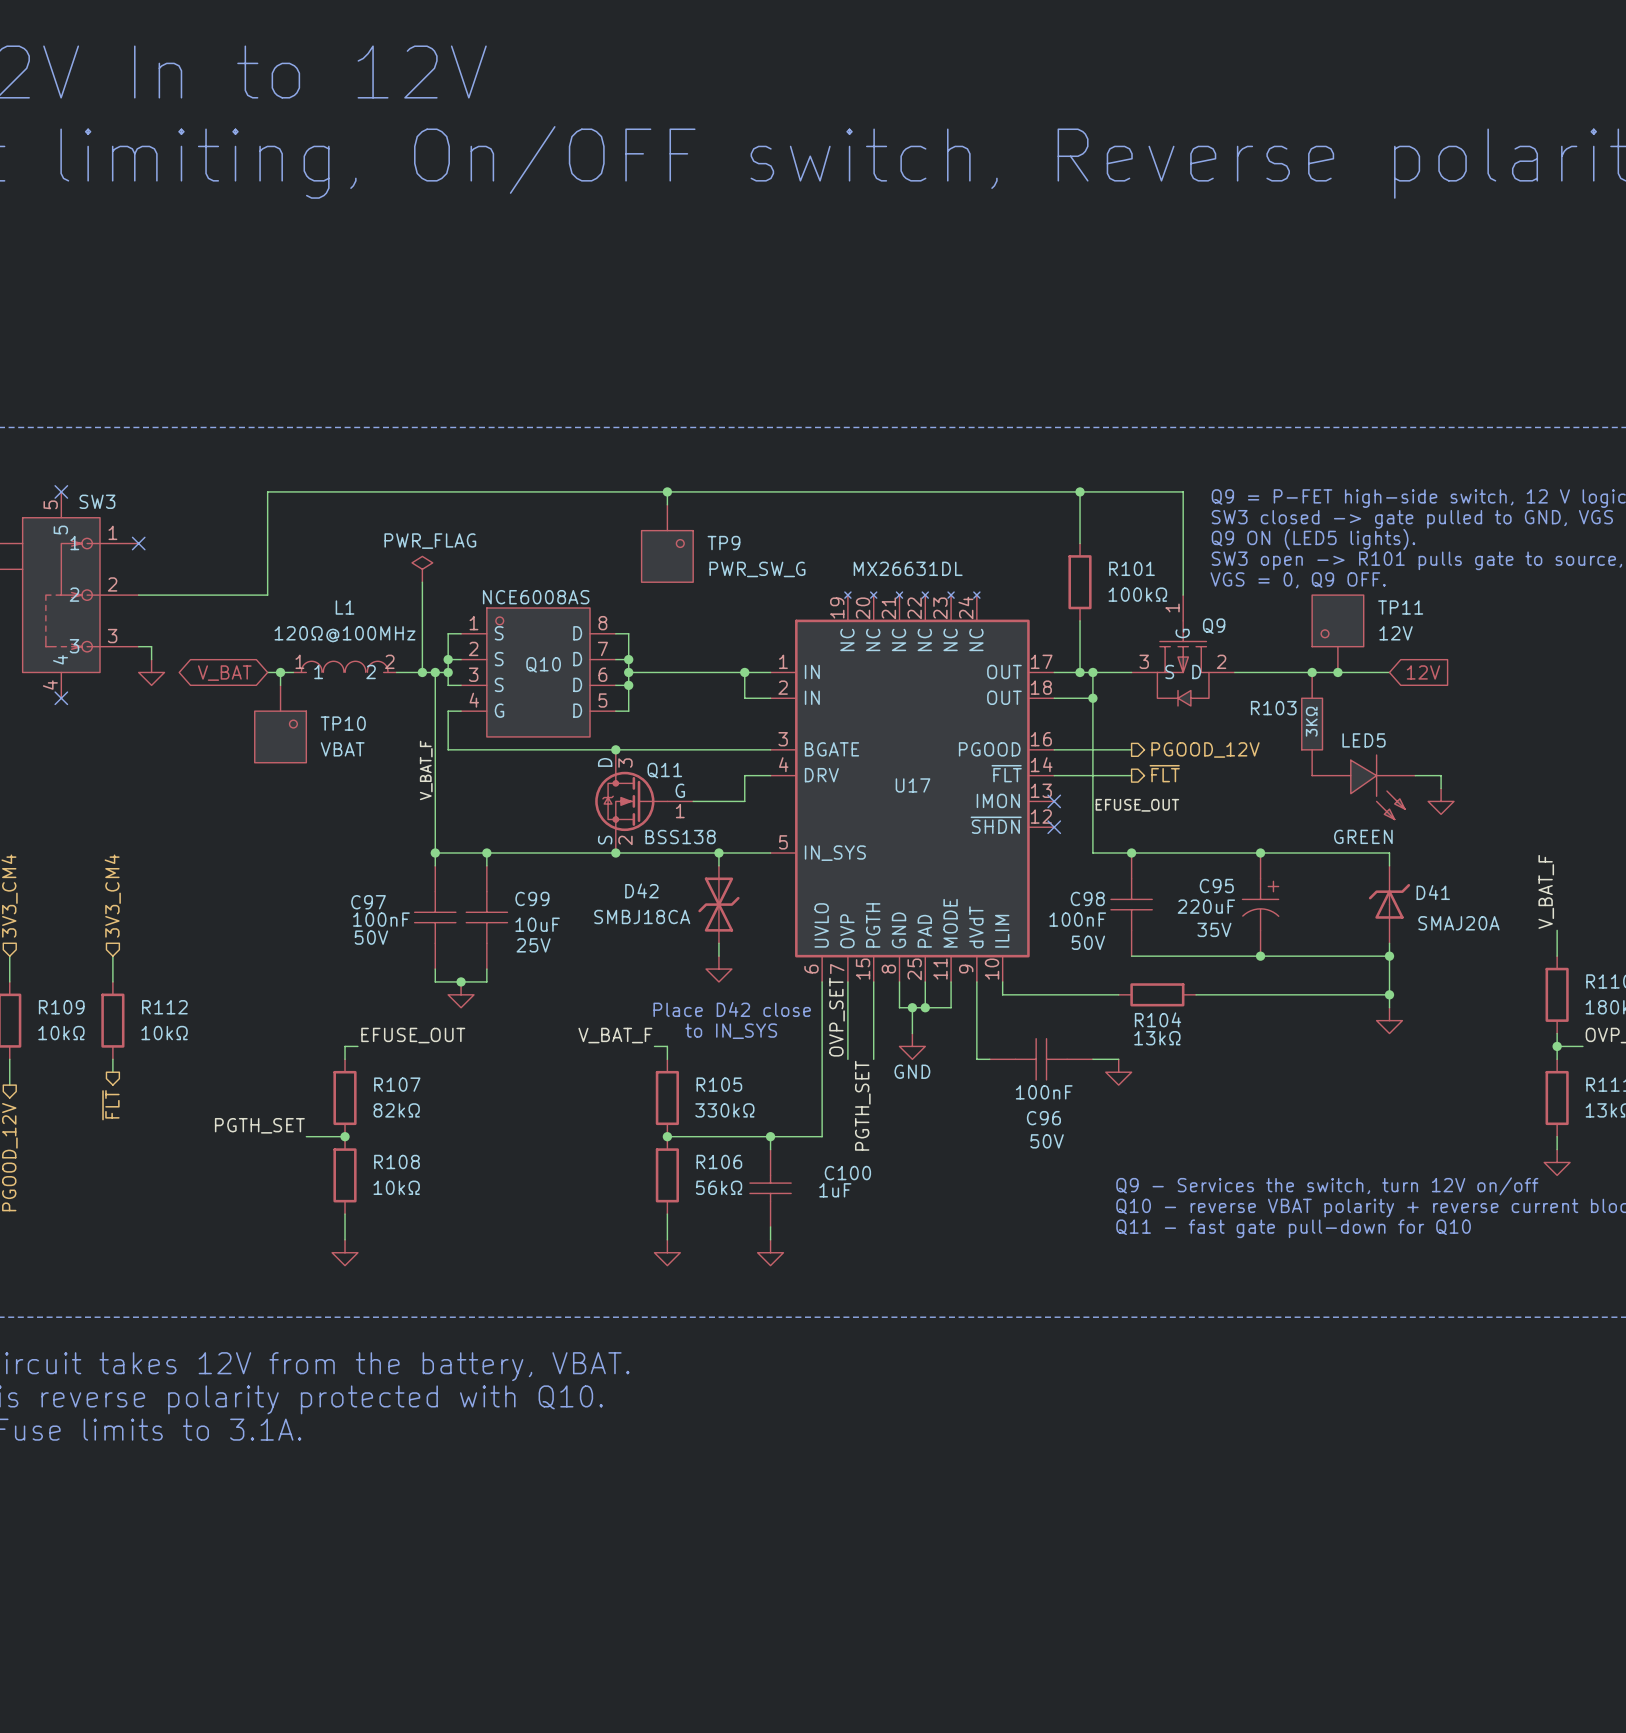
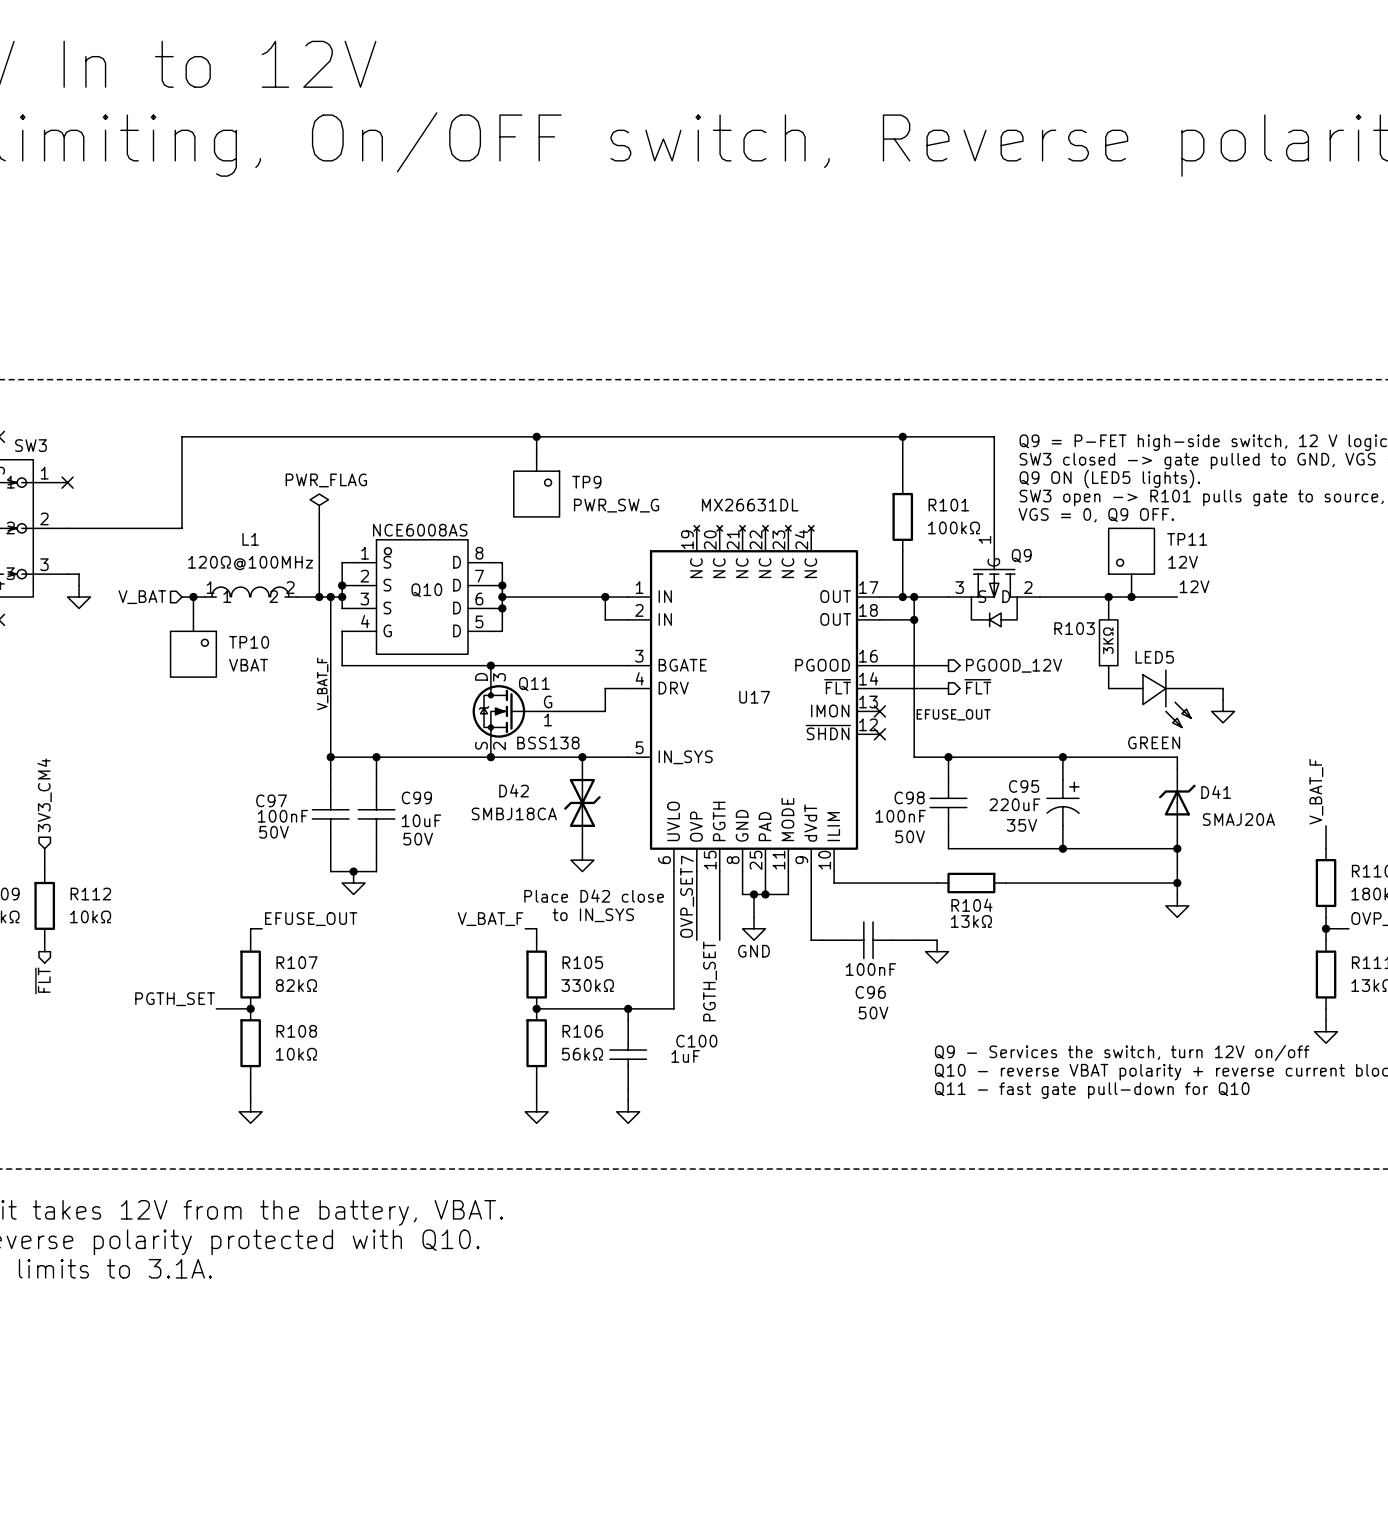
label: none -> 12V (1194, 586)
hierarchical label: none -> V_BAT (142, 597)
global label: 12V (1423, 672) -> none
global label: V_BAT (224, 673) -> none
C99 text: 25V (533, 945) -> 50V (418, 839)

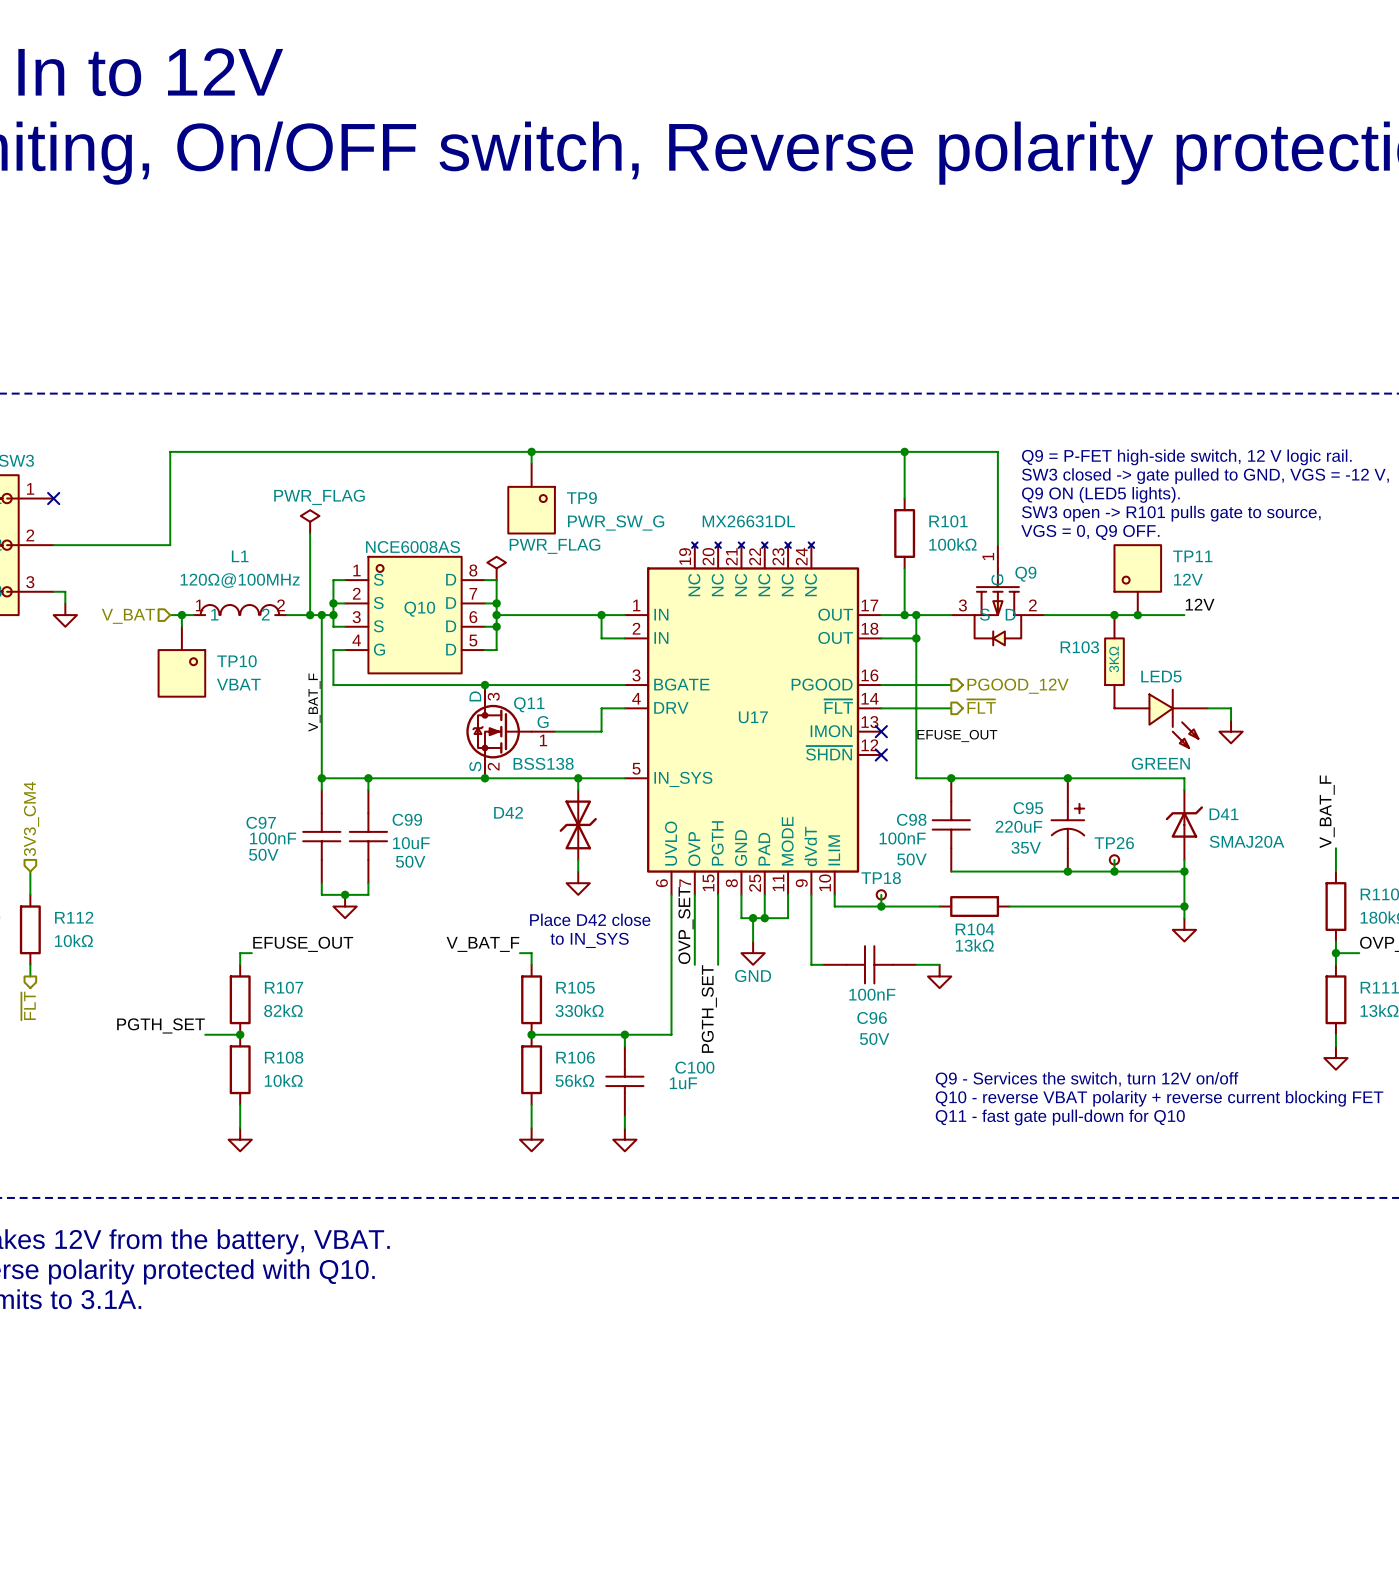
power symbol: none -> PWR_FLAG (496, 568)
D42 value: SMBJ18CA (514, 813) -> none
wire: none -> (1114, 859) (1114, 871)
TP26: none -> (1114, 859)
junction: none -> (1114, 871)
wire: none -> (881, 894) (881, 906)
TP18: none -> (881, 894)
junction: none -> (881, 906)

